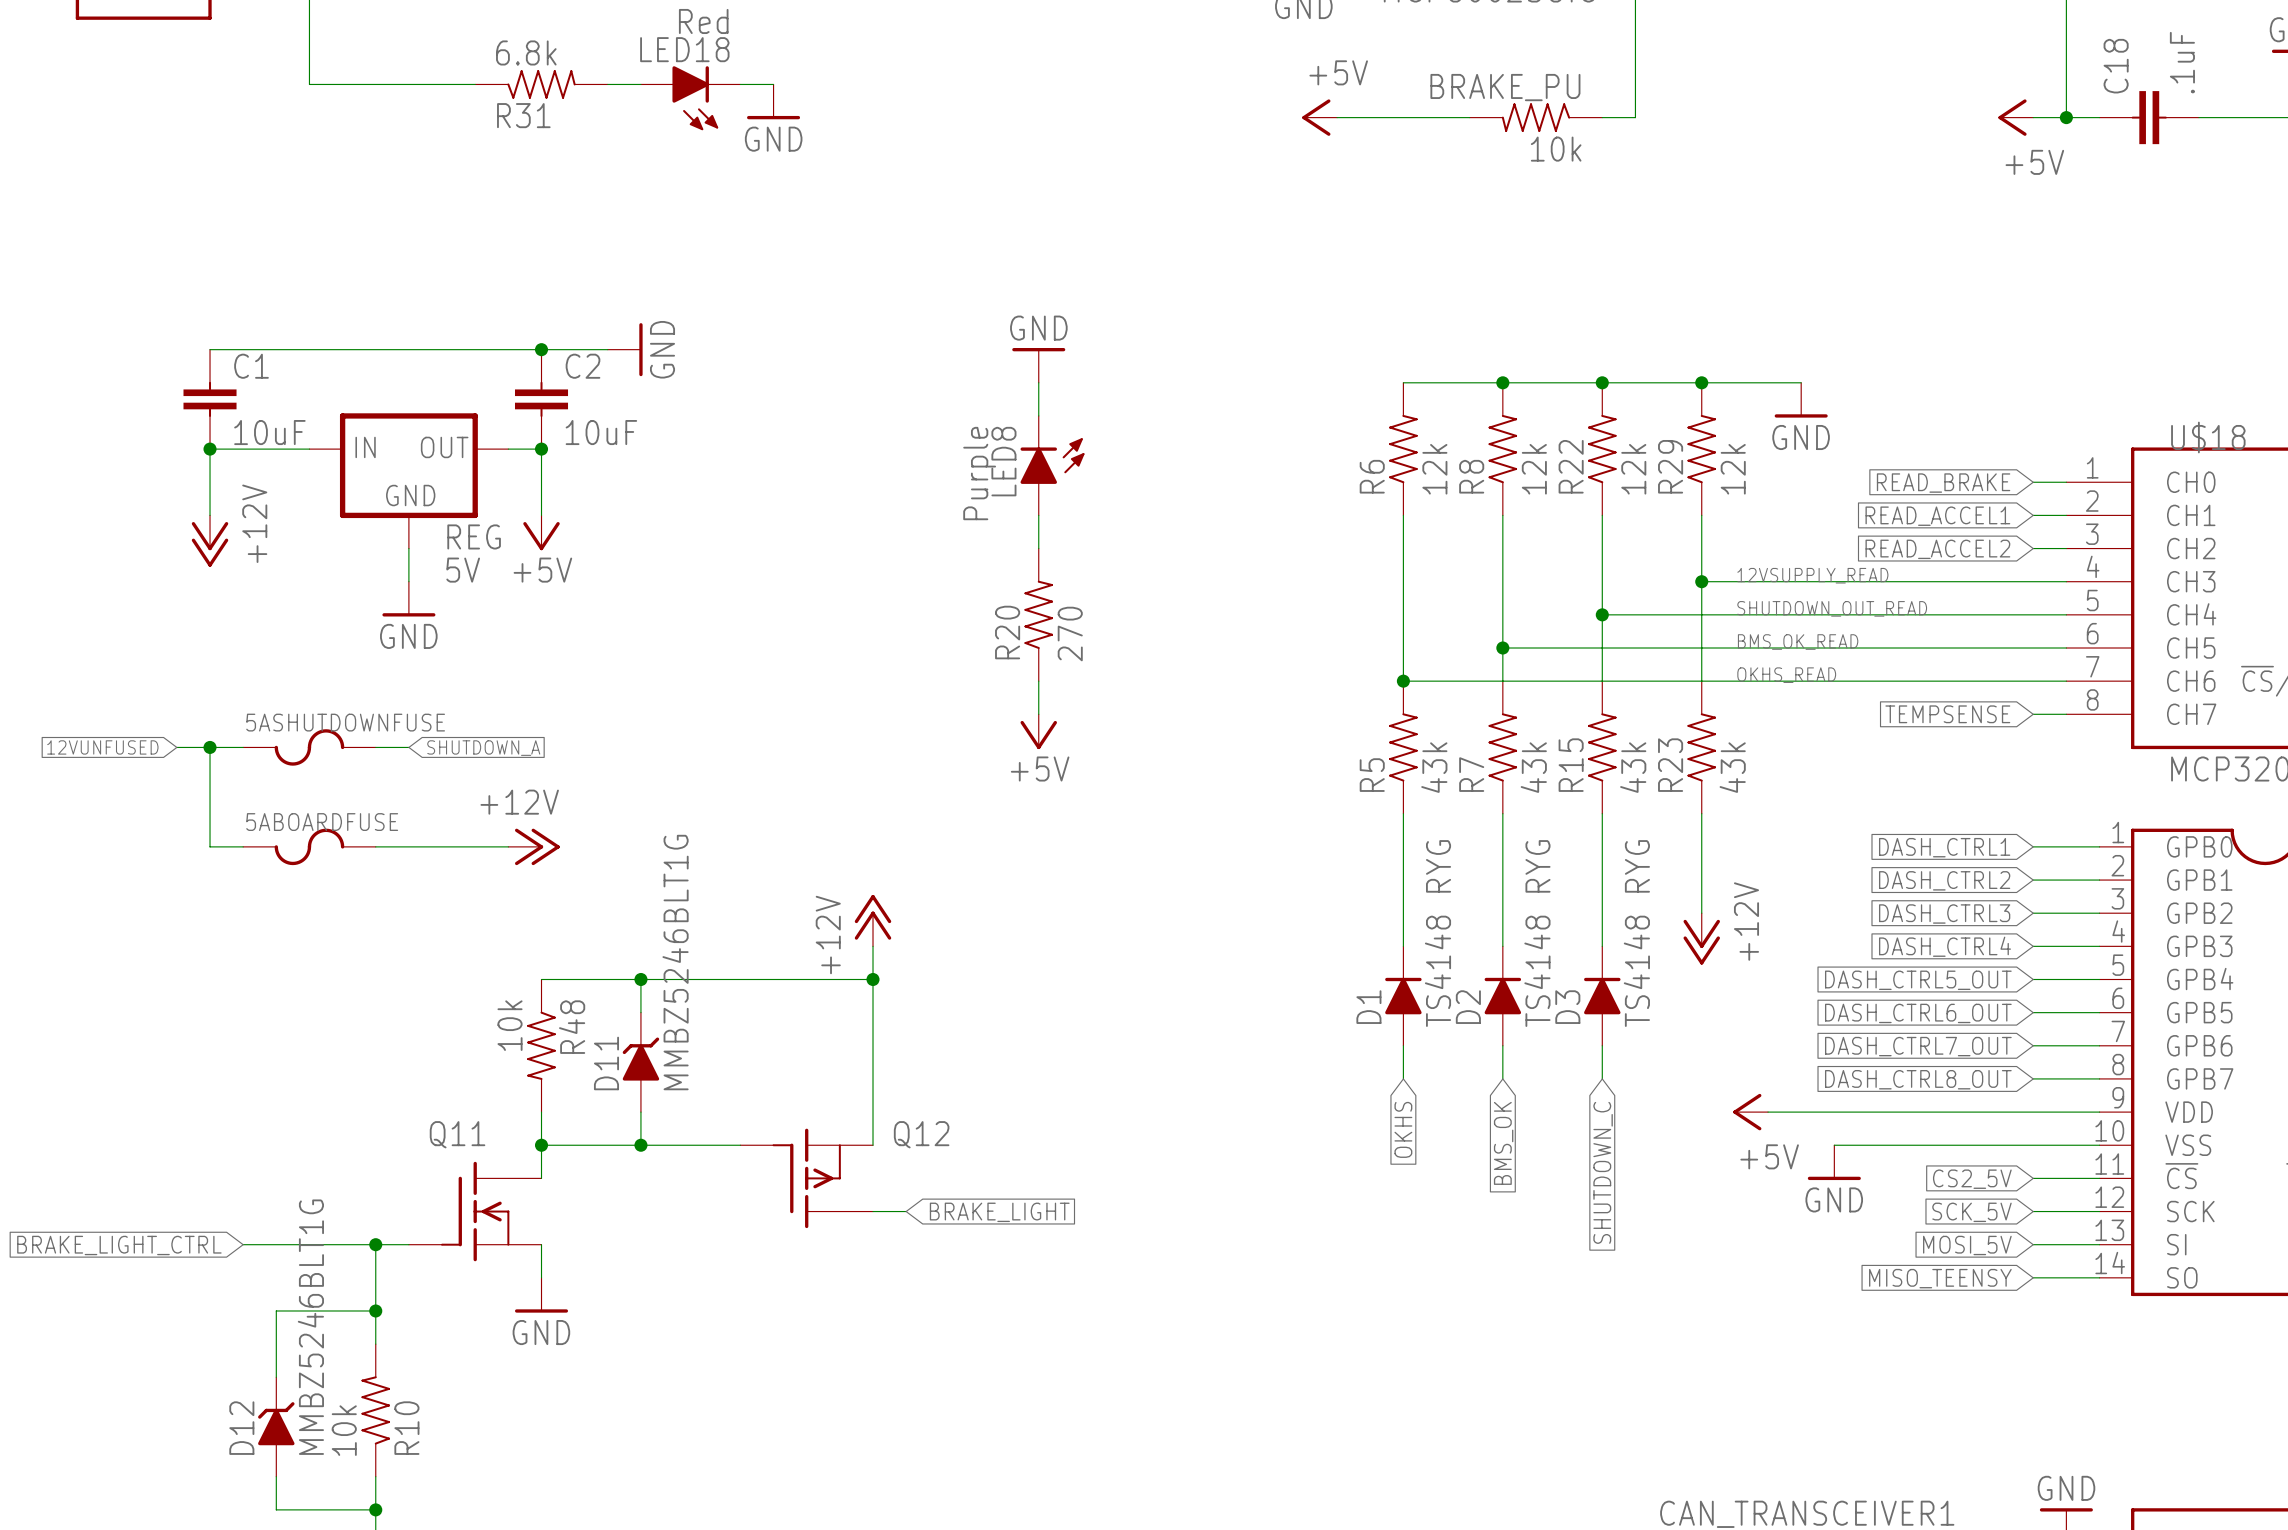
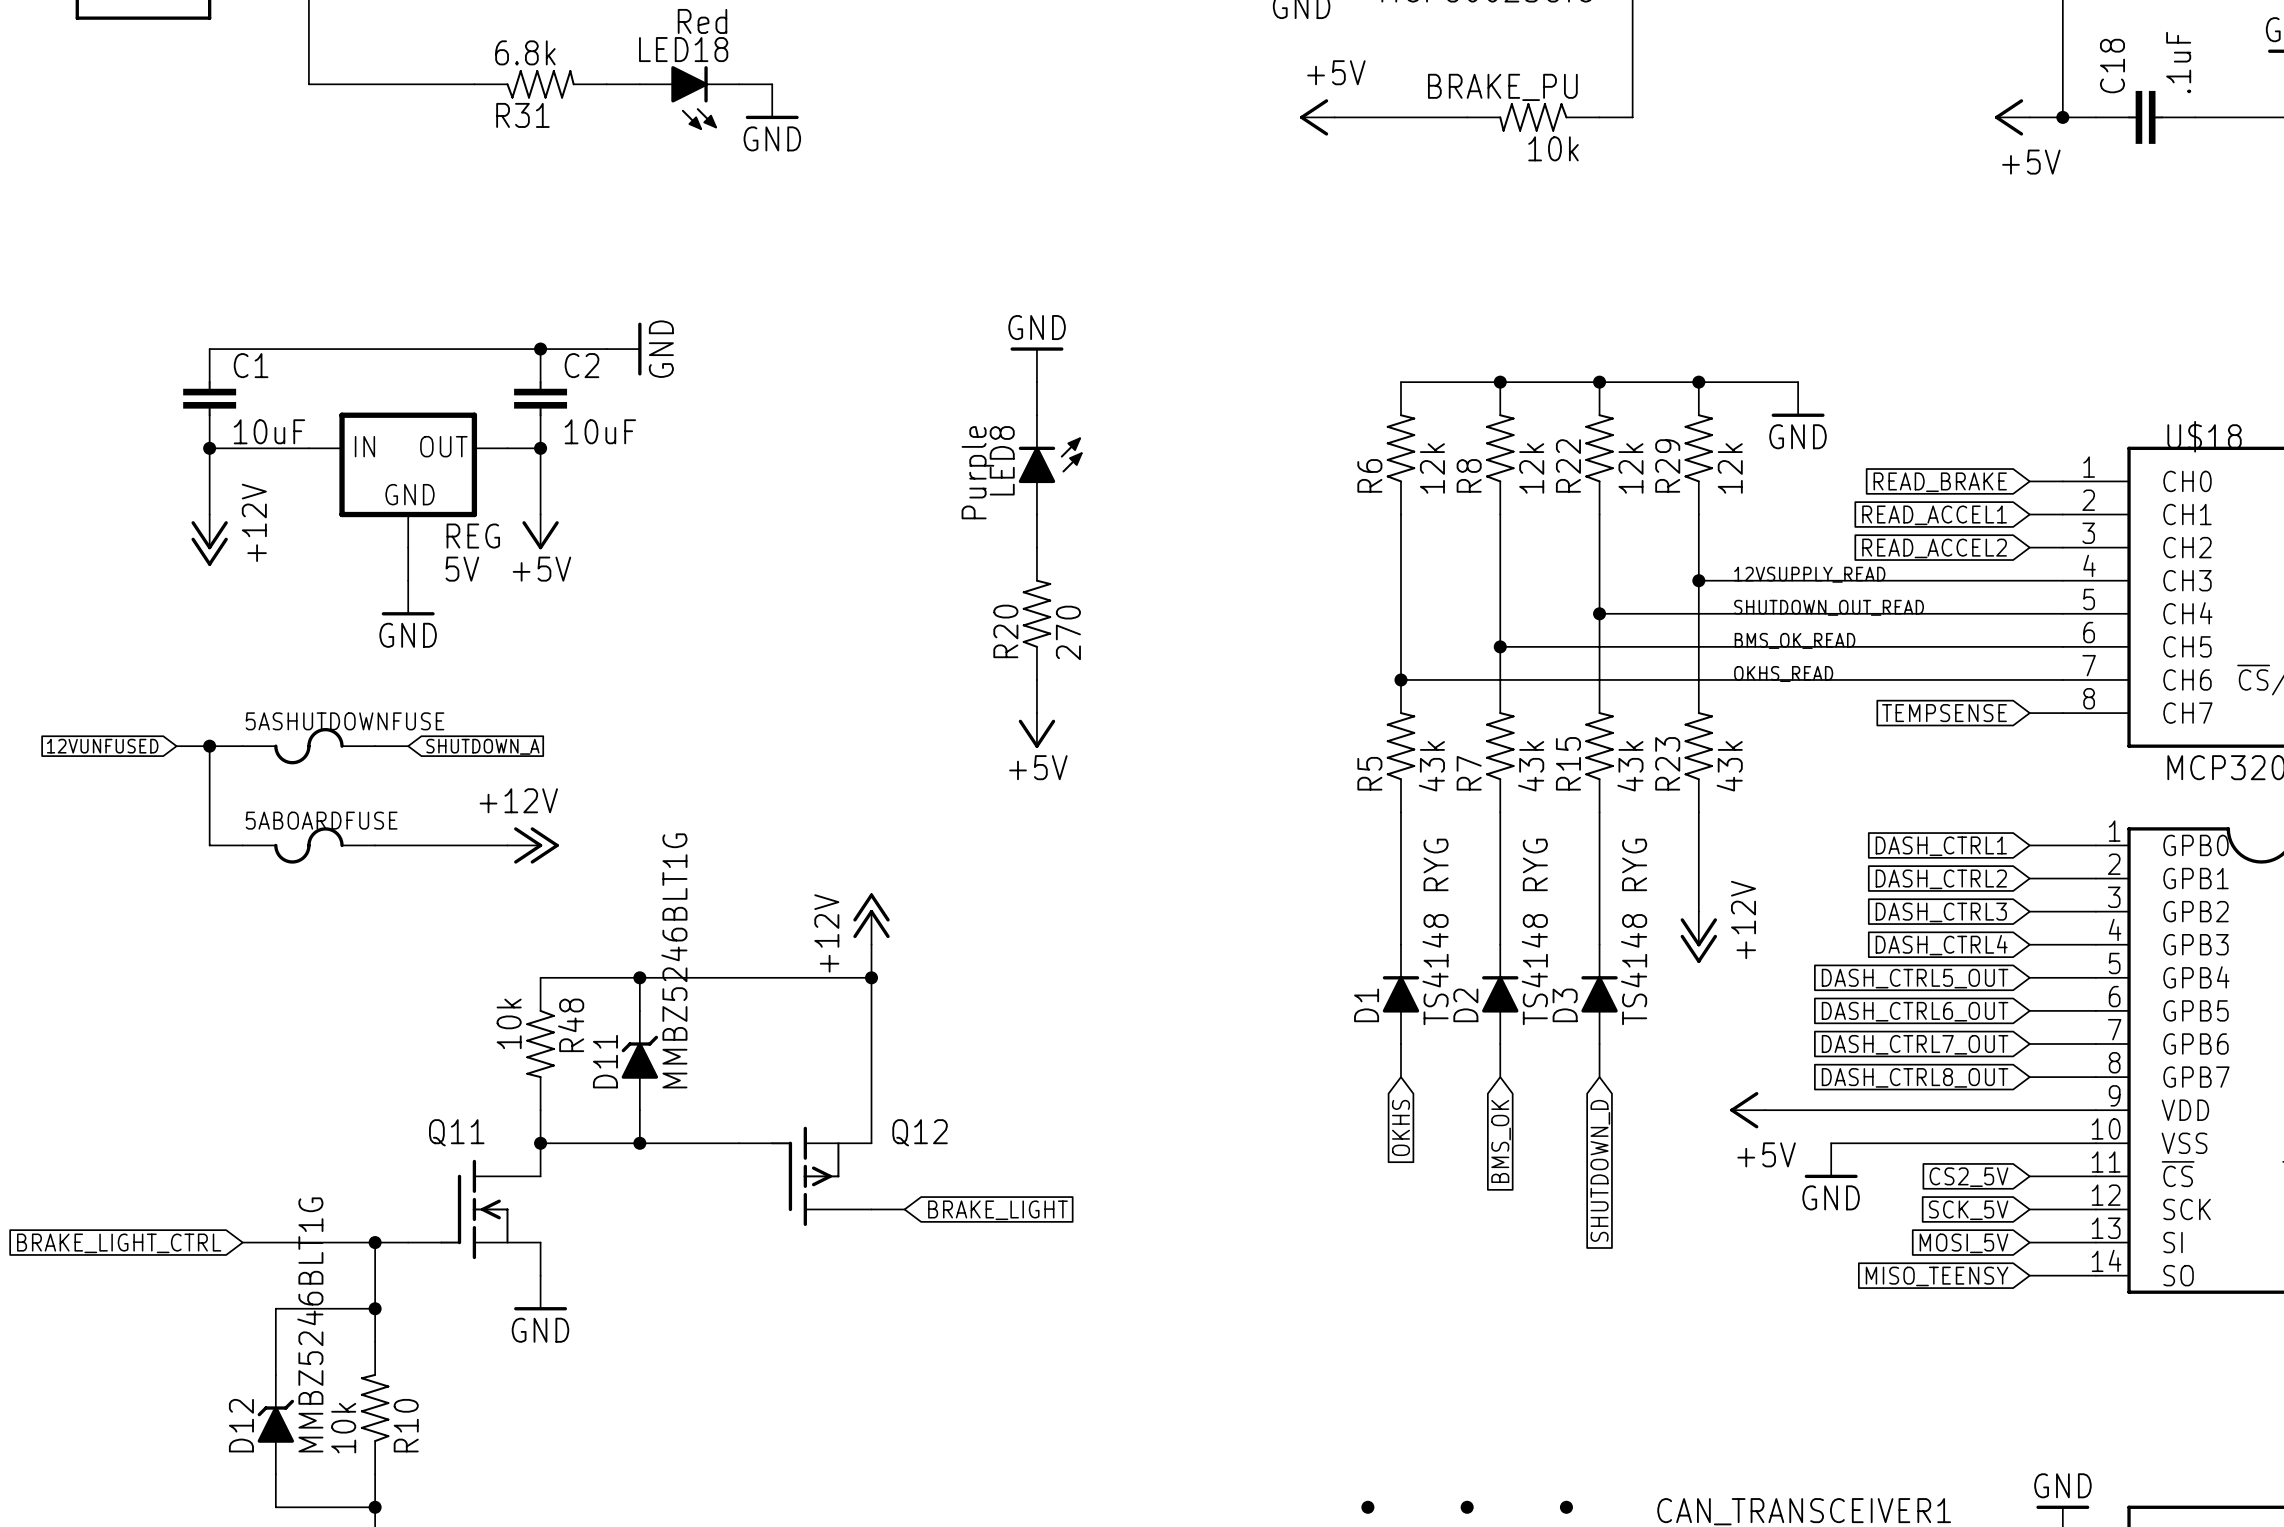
global label: SHUTDOWN_C (1603, 1172) -> SHUTDOWN_D (1600, 1170)
junction: none -> (1367, 1507)
junction: none -> (1467, 1507)
junction: none -> (1566, 1507)

